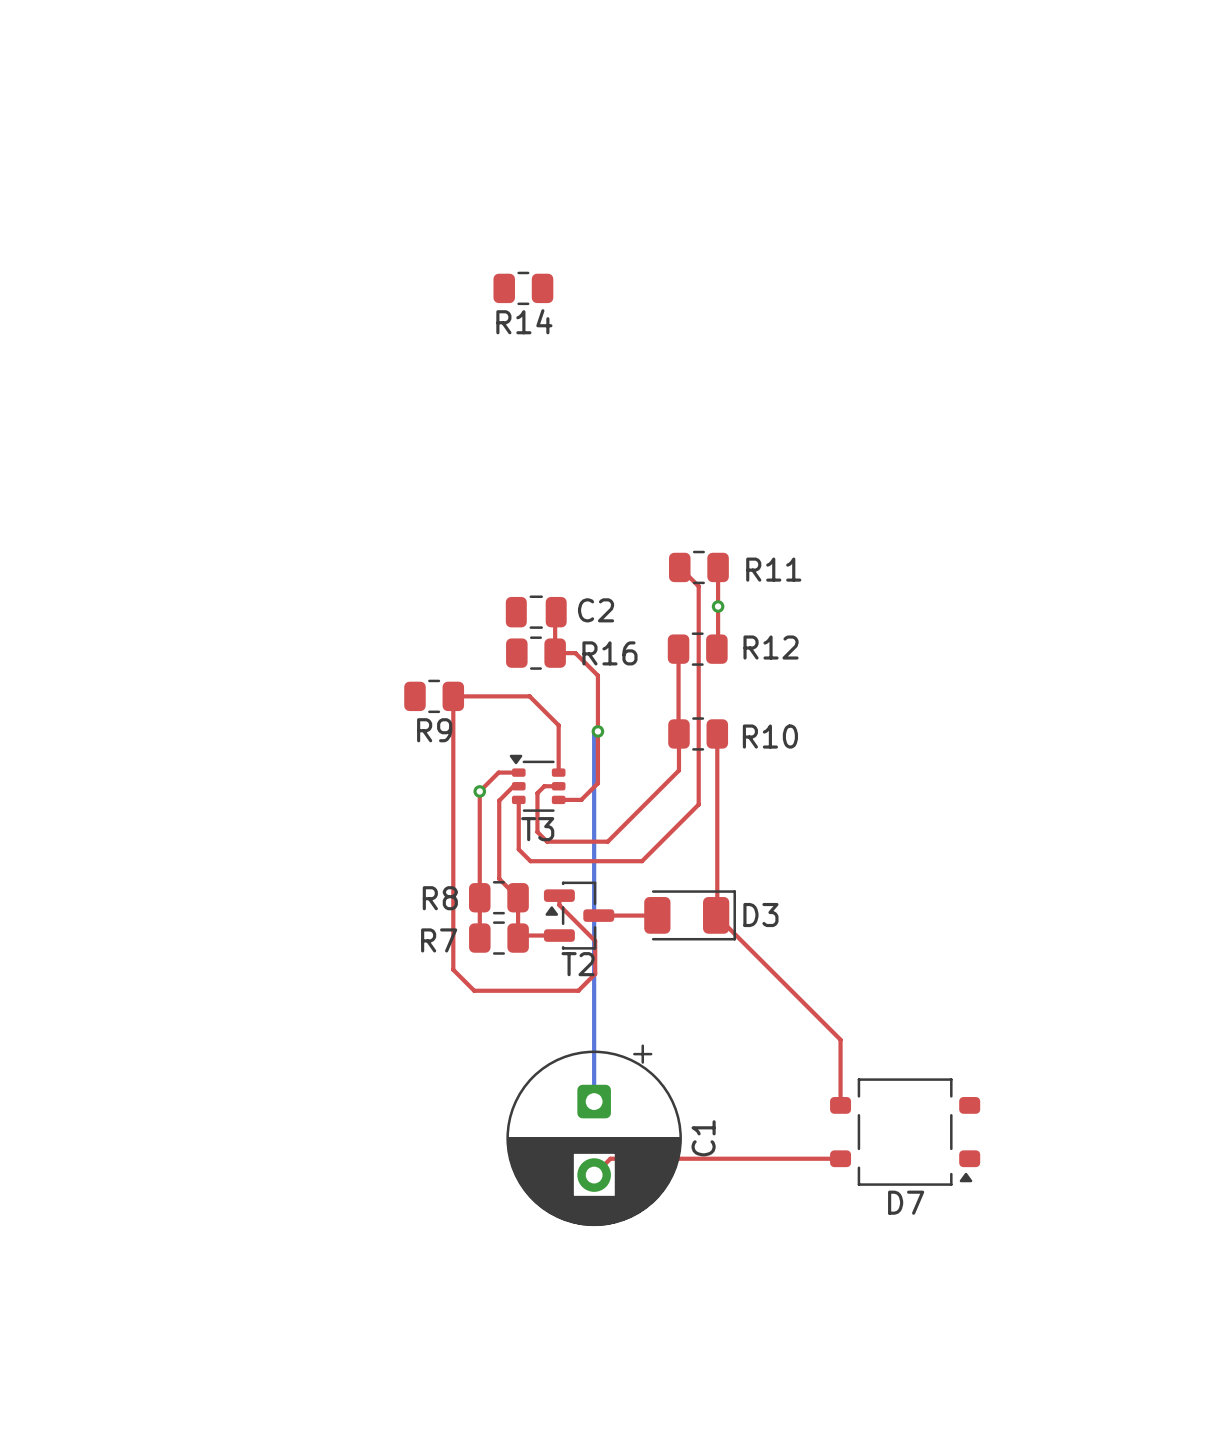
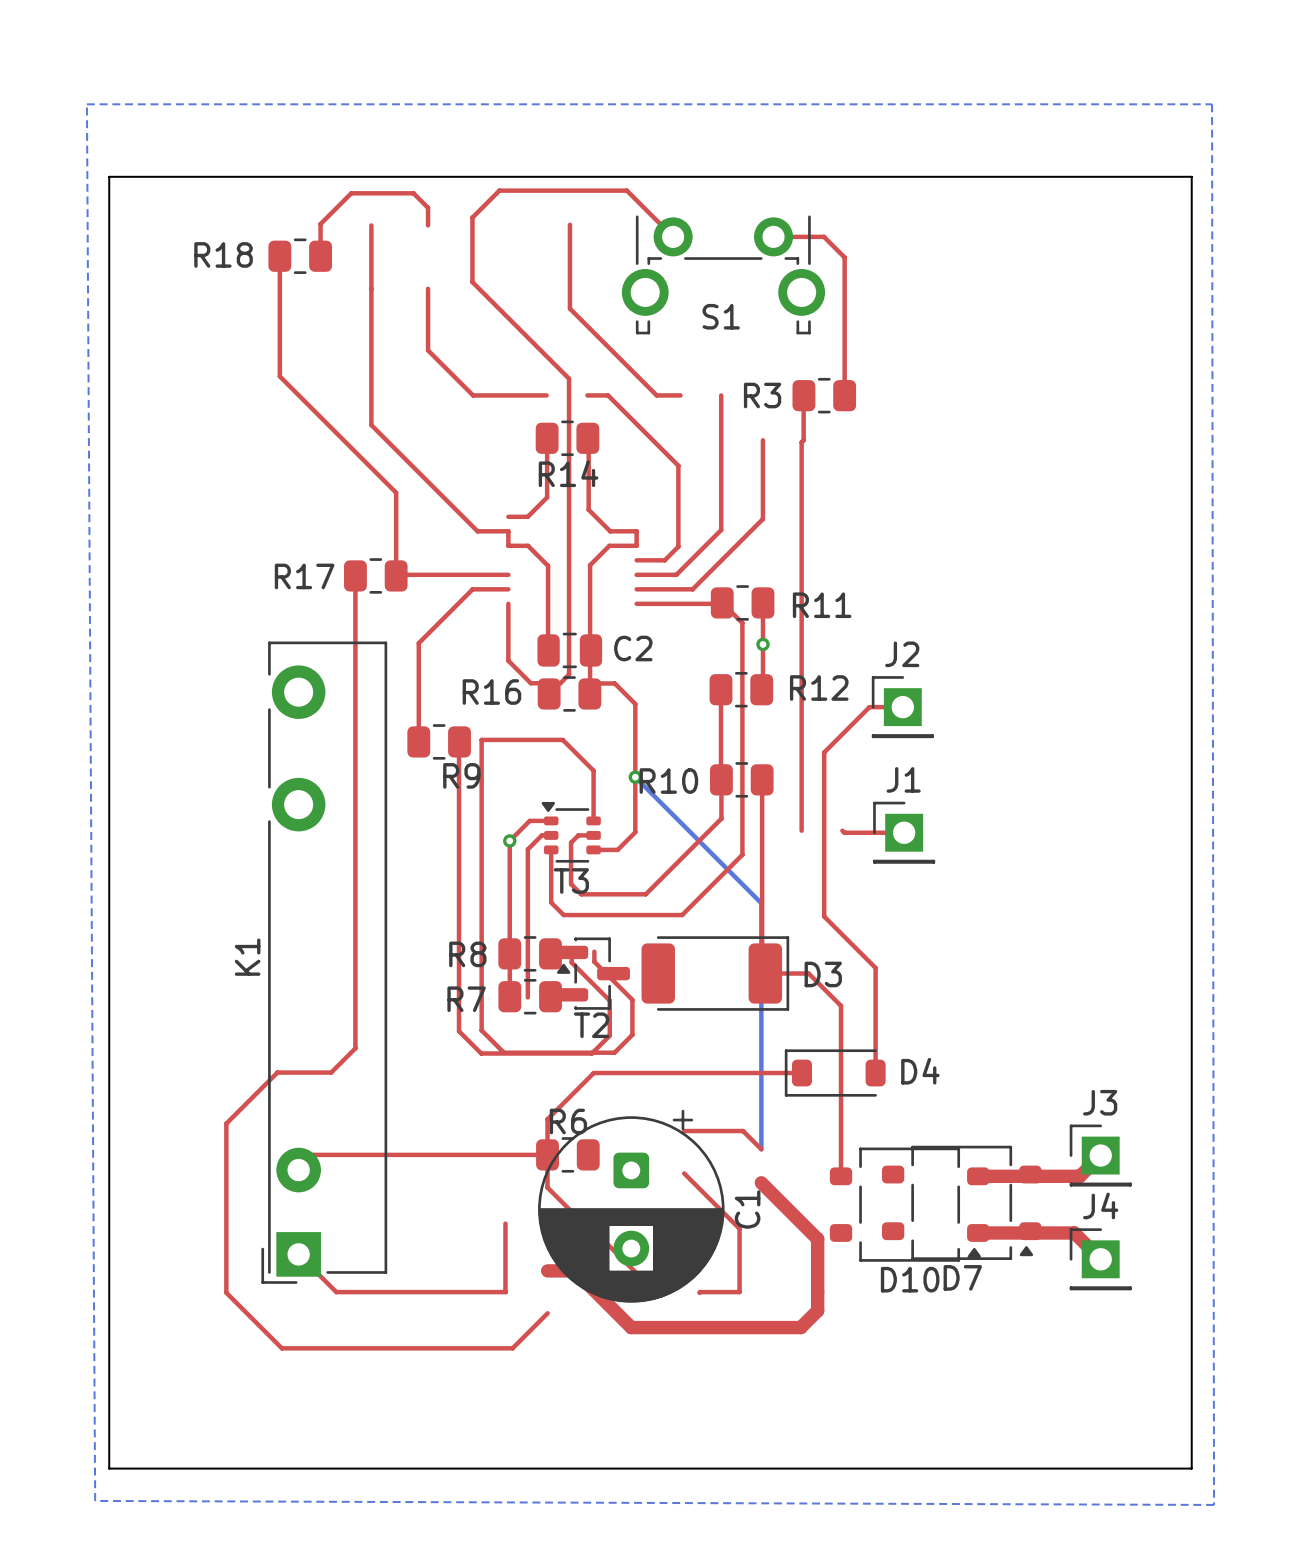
bottom zone outline: none -> (86, 104) (95, 1500) (1214, 1504) (1212, 104) (86, 104)
board edge: none -> (109, 176) (1191, 176) (1191, 1468) (109, 1468) (109, 176)
top track: none -> (569, 224) (569, 308) (656, 395) (680, 395)
top track: none -> (371, 225) (371, 425) (477, 531) (508, 531) (508, 545) (528, 545) (548, 565) (548, 639)
top track: none -> (428, 225) (428, 207) (413, 193) (351, 193) (320, 224) (320, 256)
top track: none -> (673, 236) (626, 190) (499, 190) (472, 217) (472, 282) (569, 378) (569, 674) (560, 683) (530, 683) (508, 660) (508, 603)
top track: none -> (773, 236) (824, 236) (844, 257) (844, 395)
top track: none -> (279, 256) (279, 376) (396, 492) (396, 575) (508, 574)
R18: none -> (300, 256)
S1: none -> (723, 274)
top track: none -> (428, 288) (428, 350) (473, 395) (546, 395)
R14 position: (523, 288) -> (567, 438)
top track: none -> (587, 395) (608, 395) (678, 465) (678, 546) (664, 560) (636, 560)
top track: none -> (721, 395) (721, 529) (676, 574) (636, 574)
top track: none -> (803, 395) (803, 440) (801, 442) (801, 830)
R3: none -> (824, 395)
top track: none -> (547, 438) (547, 497) (527, 516) (508, 516)
top track: none -> (587, 438) (588, 509) (610, 531) (636, 531) (636, 545) (609, 545) (590, 565) (590, 683)
top track: none -> (762, 440) (762, 519) (692, 589) (636, 589)
top track: none -> (355, 575) (355, 1048) (331, 1072) (277, 1072) (226, 1123) (226, 1292) (281, 1348) (512, 1348) (547, 1313)
R17: none -> (375, 575)
top track: none -> (508, 589) (472, 589) (418, 643) (418, 741)
top track: none -> (722, 602) (636, 603)
top track: (555, 613) (555, 653) (575, 653) (597, 675) -> (590, 683) (614, 683) (635, 704) (635, 717)
R16 name position: R16 (609, 653) -> R16 (491, 692)
top track: none -> (902, 707) (869, 707) (824, 752) (824, 916) (875, 967) (875, 1073)
J2: none -> (902, 707)
R9 position: (434, 696) -> (439, 741)
top track: none -> (459, 740) (459, 1031) (481, 1053) (591, 1053) (609, 1035) (609, 1000) (571, 962) (571, 952)
bottom track: (597, 731) (594, 735) (594, 1101) -> (635, 777) (761, 903) (761, 1149)
R10 name position: R10 (770, 736) -> R10 (668, 781)
top track: none -> (842, 830) (844, 832) (904, 832)
J1: none -> (904, 832)
top track: (513, 786) (499, 800) (499, 878) (518, 897) (518, 938) (520, 935) (559, 935) -> (545, 835) (541, 835) (527, 849) (527, 997)
D3 footprint: [644, 890, 736, 941] -> [641, 936, 790, 1011]
top track: (717, 895) (716, 915) (840, 1039) (840, 1105) -> (762, 951) (765, 954) (765, 973) (808, 973) (841, 1005) (841, 1176) (842, 1175)
K1: none -> (324, 962)
T2 position: (579, 915) -> (592, 973)
top track: (598, 915) (657, 915) -> none
top track: none -> (801, 1073) (593, 1073) (547, 1119) (547, 1187) (583, 1223) (586, 1223) (656, 1292) (658, 1292)
D4: none -> (835, 1073)
top track: none -> (684, 1131) (743, 1131) (761, 1149)
top track: none -> (547, 1154) (313, 1154) (298, 1170)
R6: none -> (567, 1154)
top track: none -> (1100, 1155) (1079, 1176) (978, 1176)
J3: none -> (1100, 1155)
top track: none -> (684, 1173) (739, 1228) (739, 1292) (699, 1292)
top track: none -> (761, 1182) (817, 1239) (817, 1310) (800, 1327) (631, 1327) (574, 1270) (547, 1270)
D10: none -> (909, 1204)
top track: none -> (505, 1223) (505, 1292) (336, 1292) (298, 1254)
top track: (840, 1158) (610, 1158) (594, 1175) -> none
top track: none -> (978, 1232) (1074, 1232) (1100, 1259)
J4: none -> (1100, 1259)

